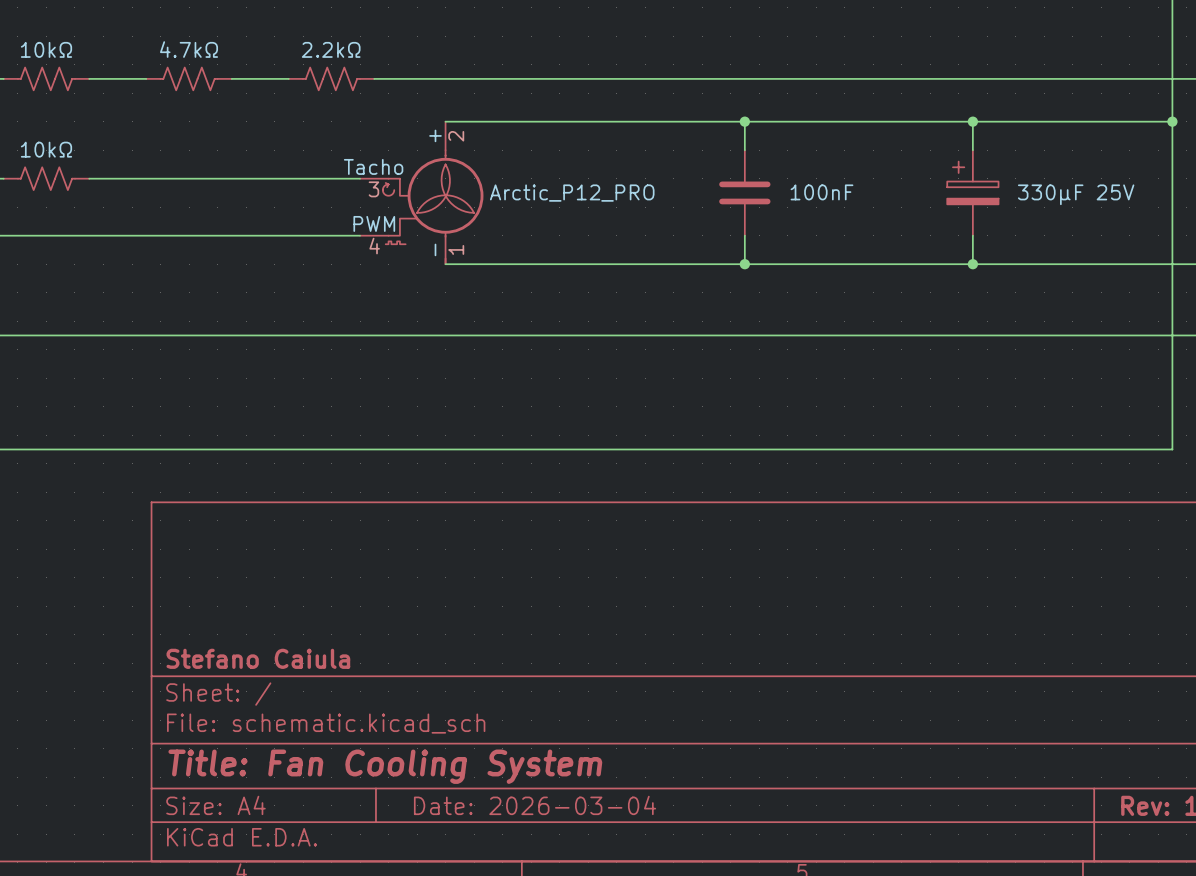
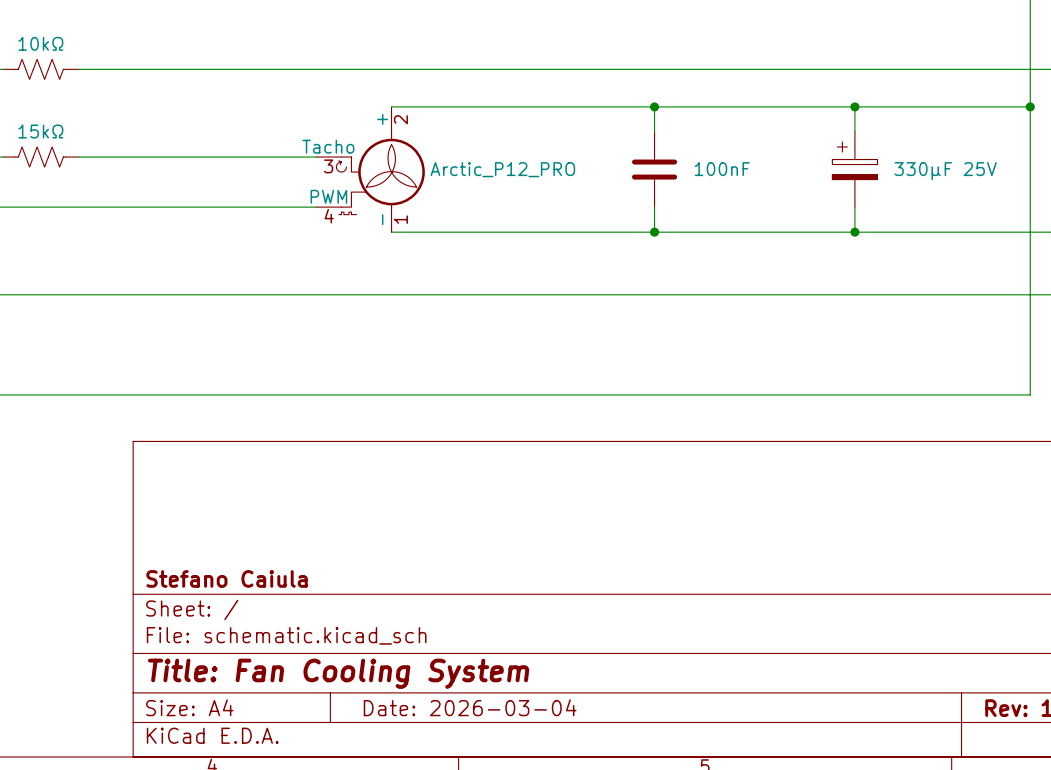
part: 4.7kΩ (189, 78) -> none
part: 2.2kΩ (331, 78) -> none
part value: 10kΩ (46, 149) -> 15kΩ (40, 131)

